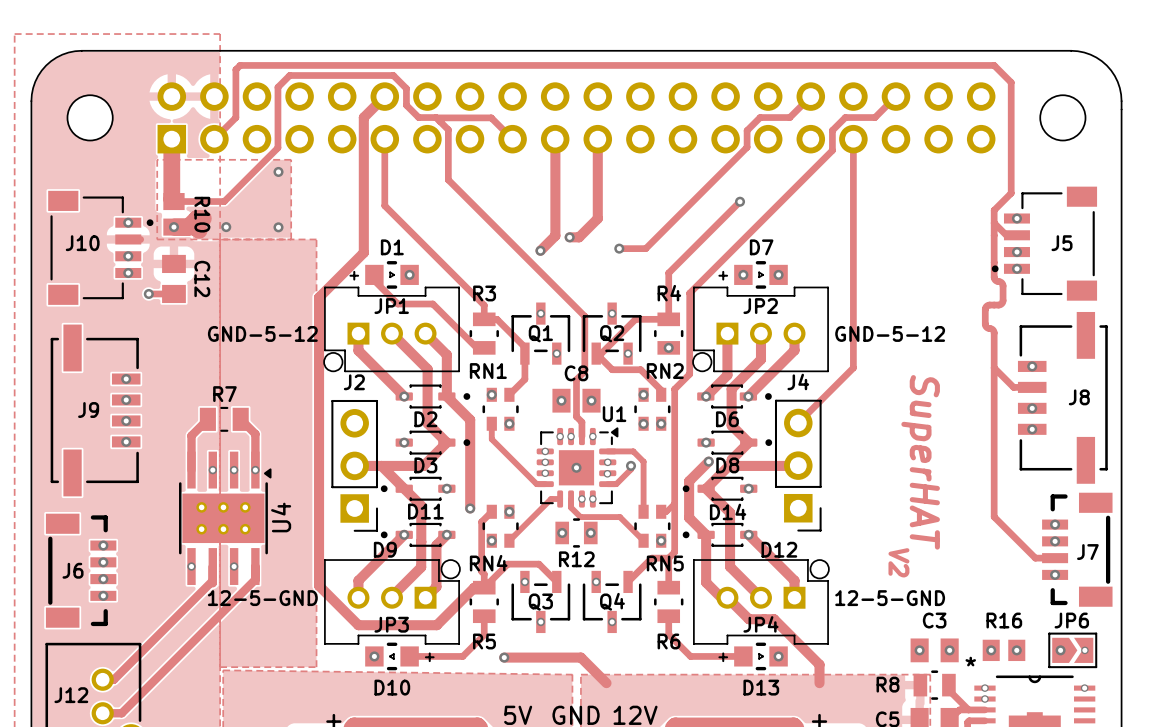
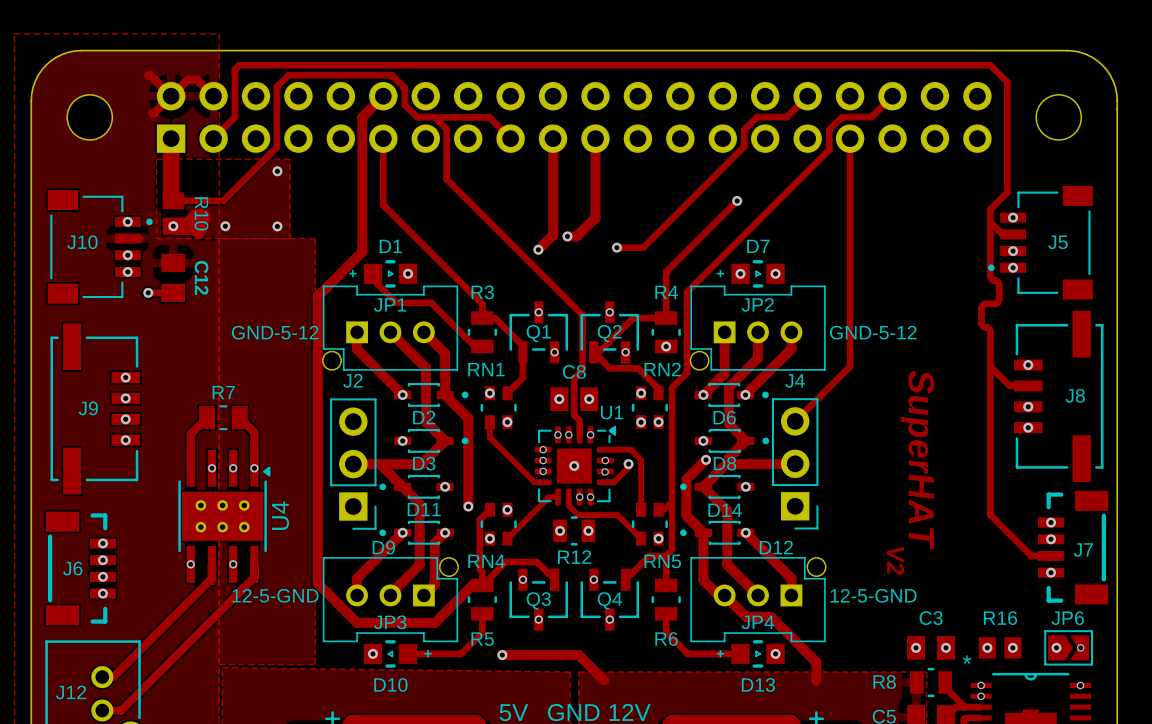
track: none -> (148, 75) (150, 75) (171, 96)
track: none -> (213, 96) (197, 79) (187, 79) (152, 113)

